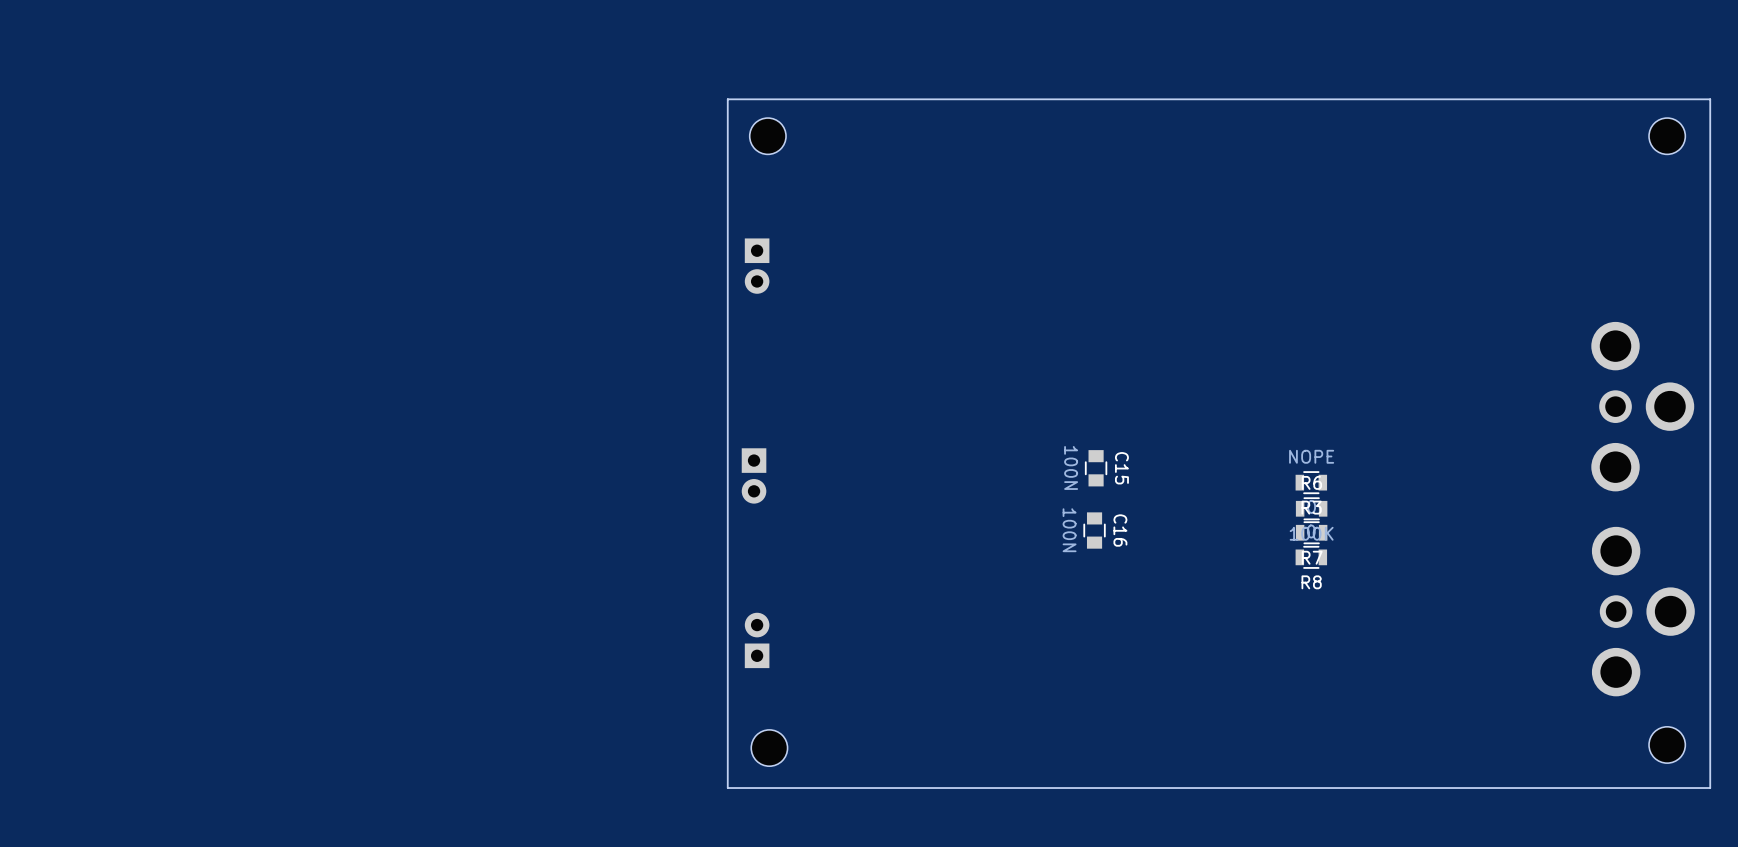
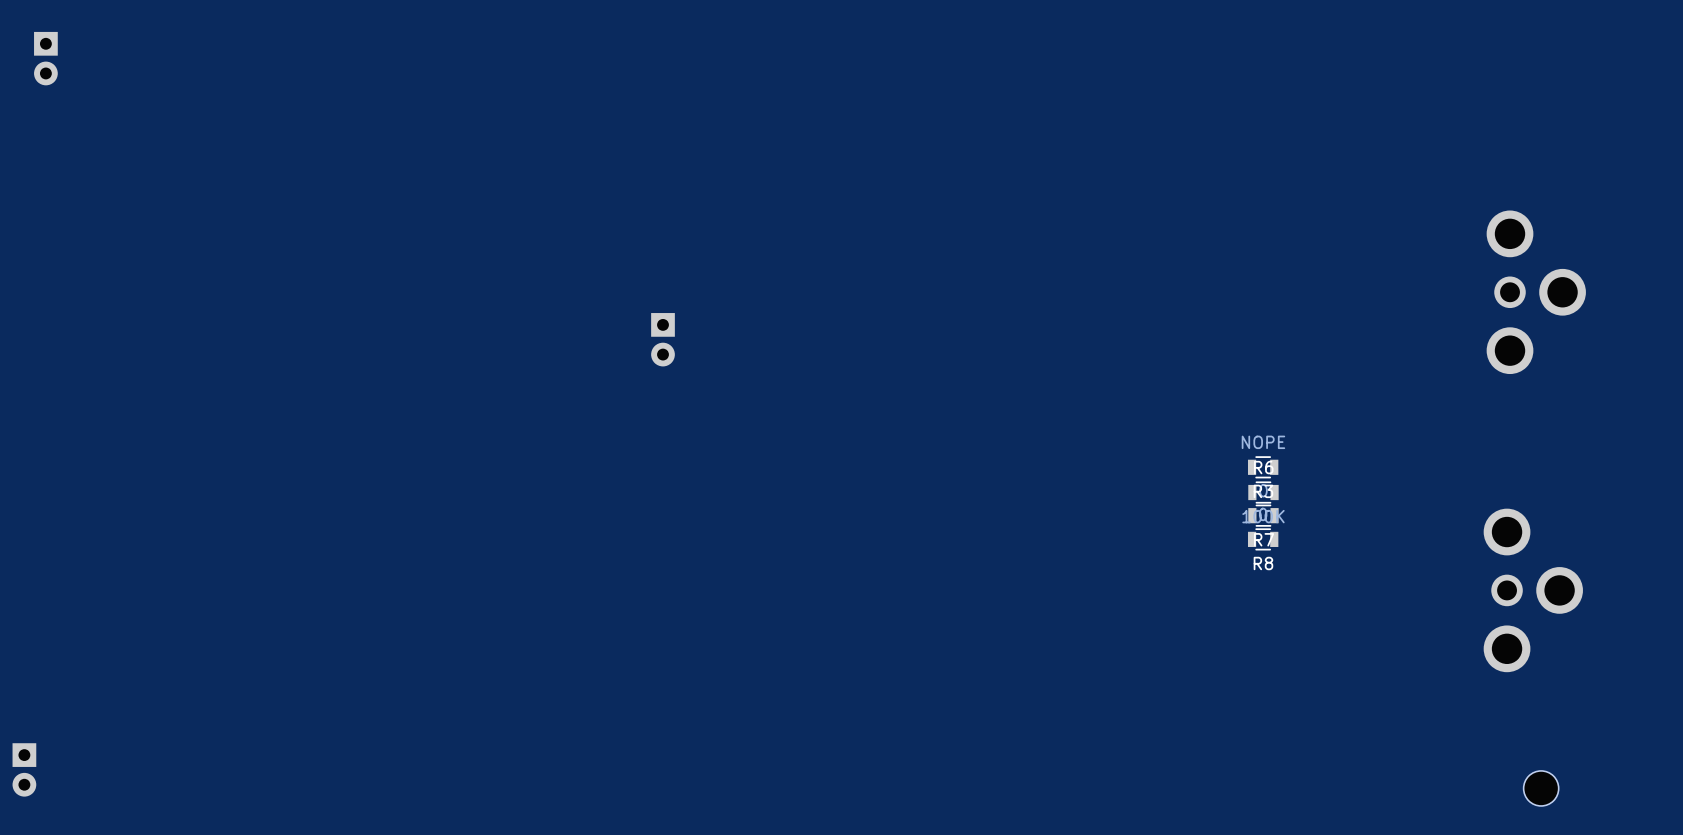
part: none -> (45, 58)
board edge: (1710, 99) (727, 99) (727, 788) (1710, 788) (1710, 99) -> none
part: (767, 136) -> none
part: (1667, 136) -> none
part: (757, 266) -> none
part: none -> (1536, 292)
part: none -> (662, 339)
part: (1642, 406) -> none
C15: 100N (1096, 468) -> none
part: (754, 475) -> none
C16: 100N (1094, 530) -> none
part position: (1643, 611) -> (1533, 590)
part: (757, 640) -> none
part position: (1667, 744) -> (1541, 788)
part: (769, 748) -> none
part: none -> (24, 769)

